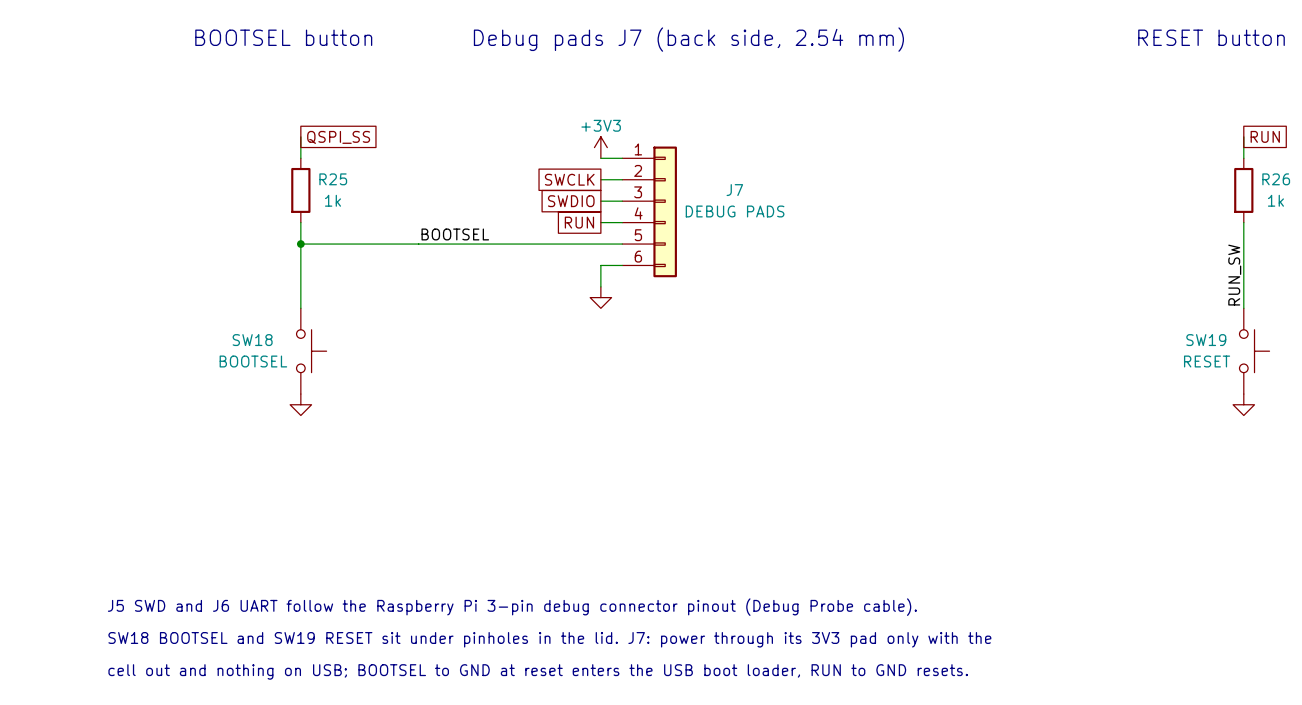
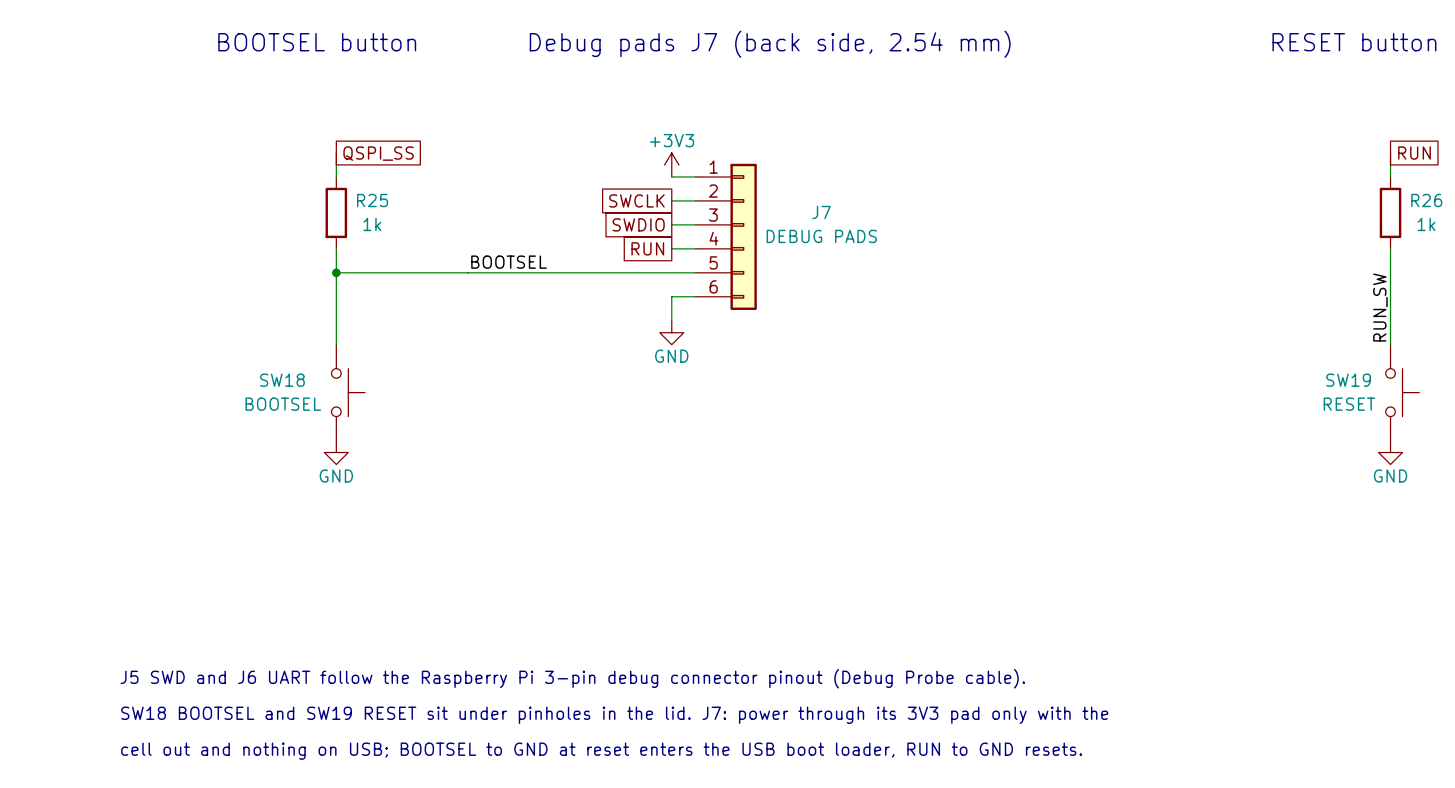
power symbol text: none -> GND (671, 356)
power symbol text: none -> GND (336, 476)
power symbol text: none -> GND (1390, 476)

